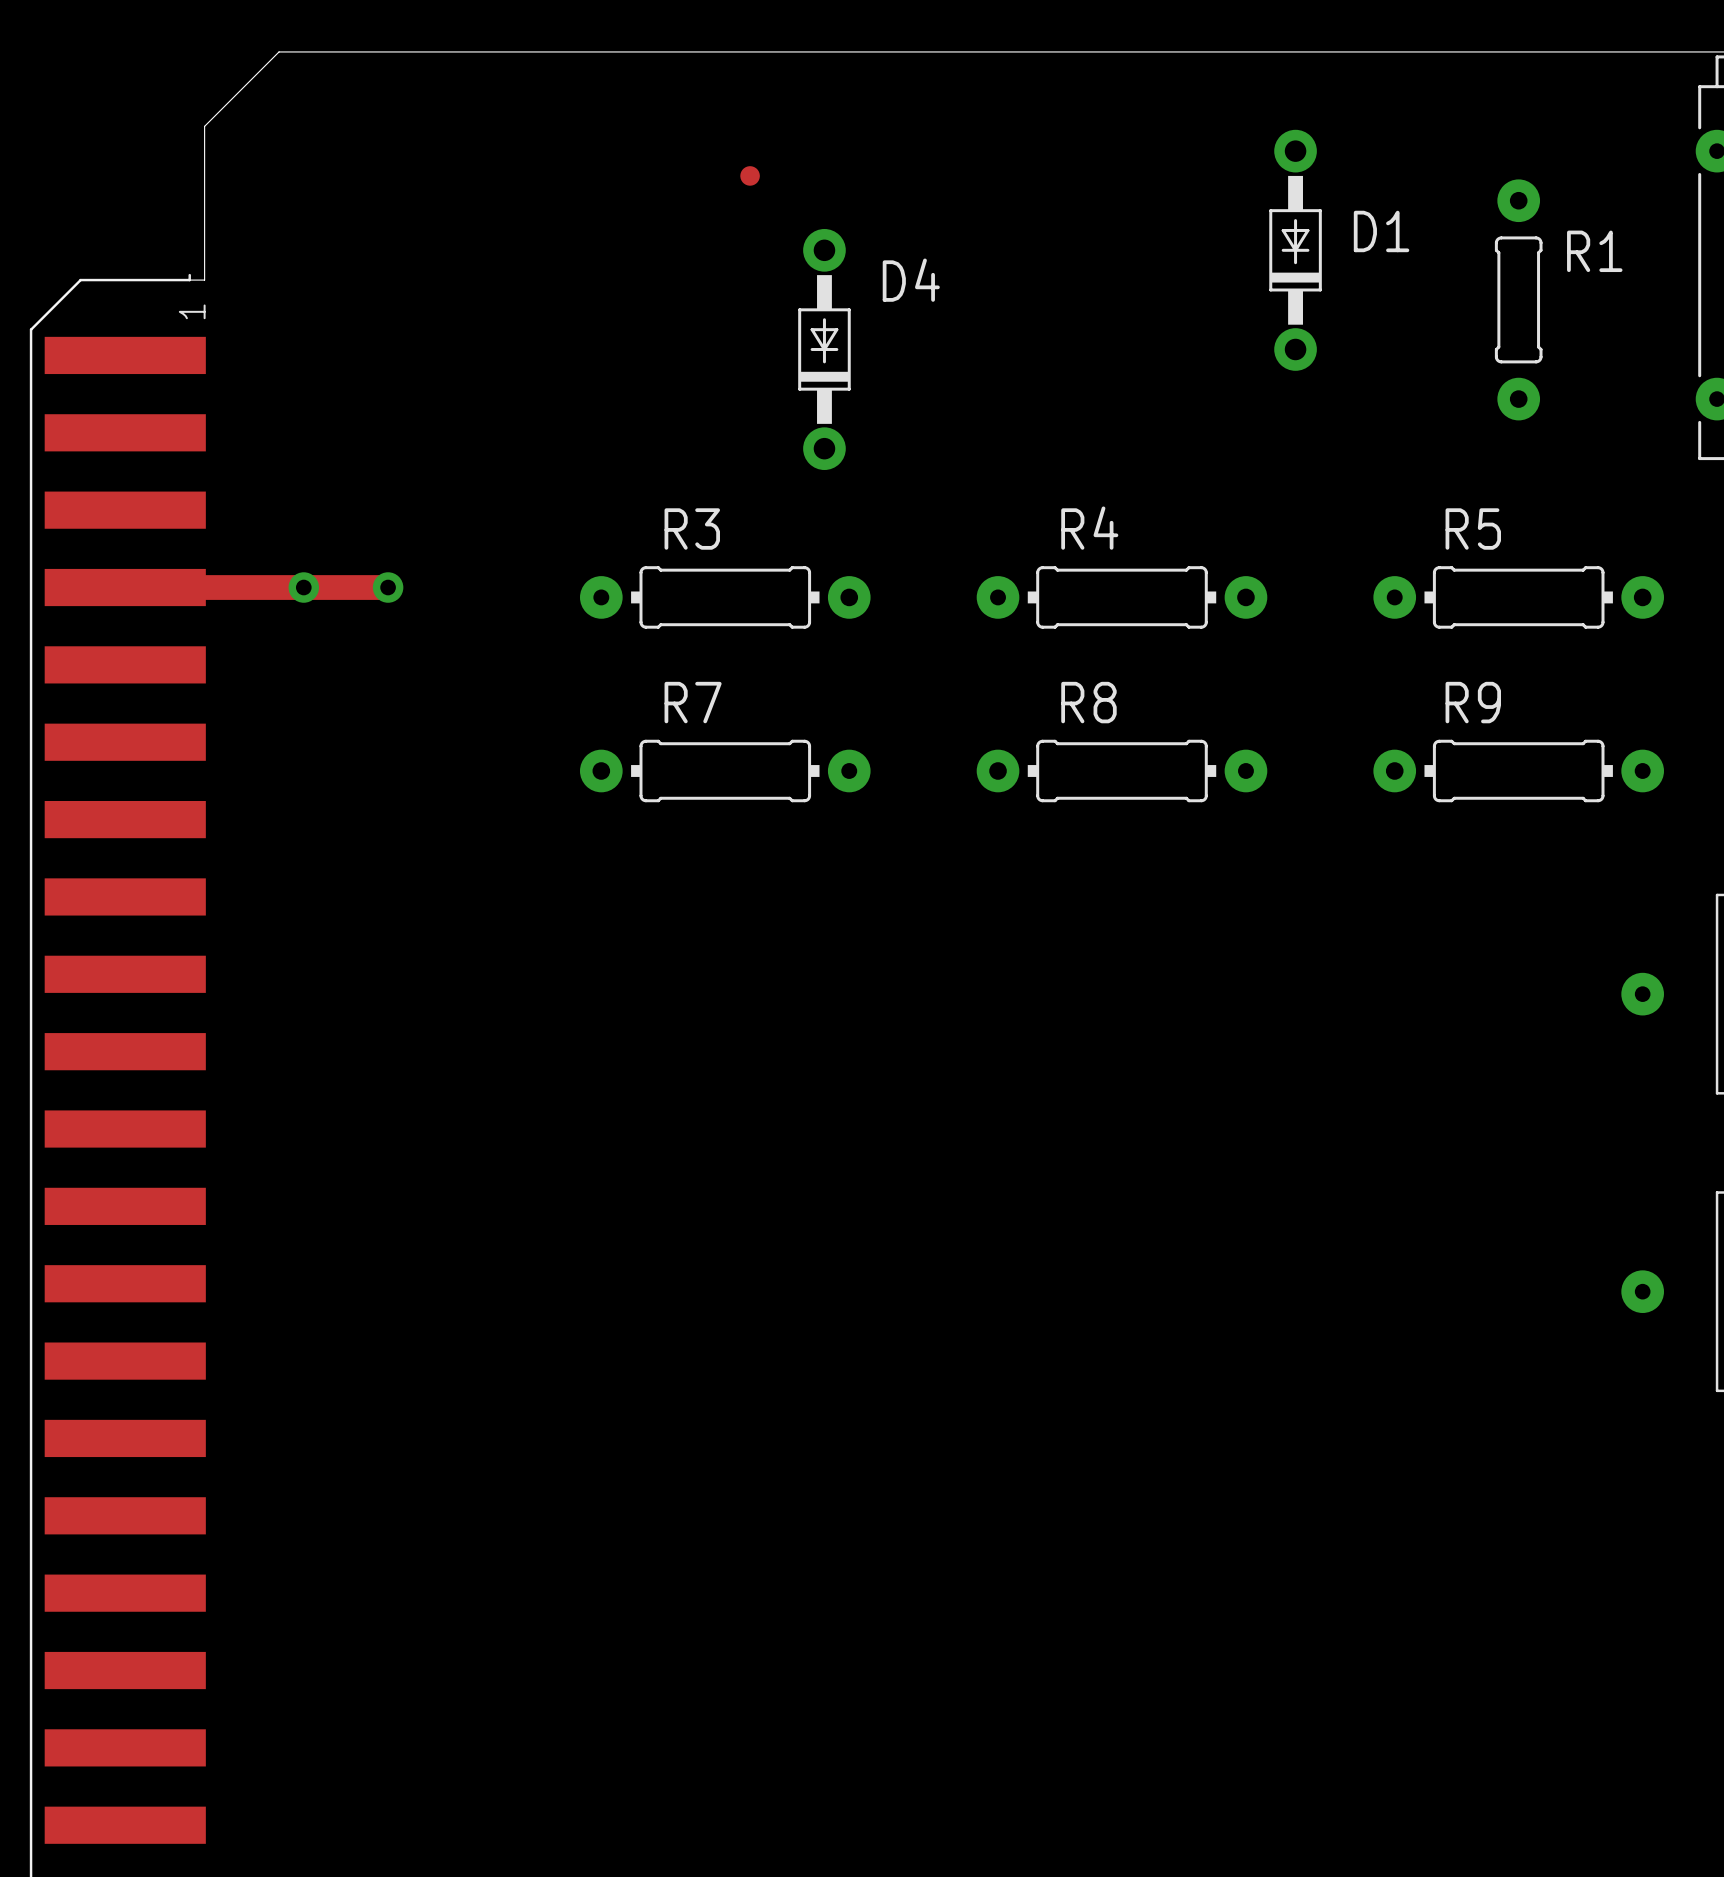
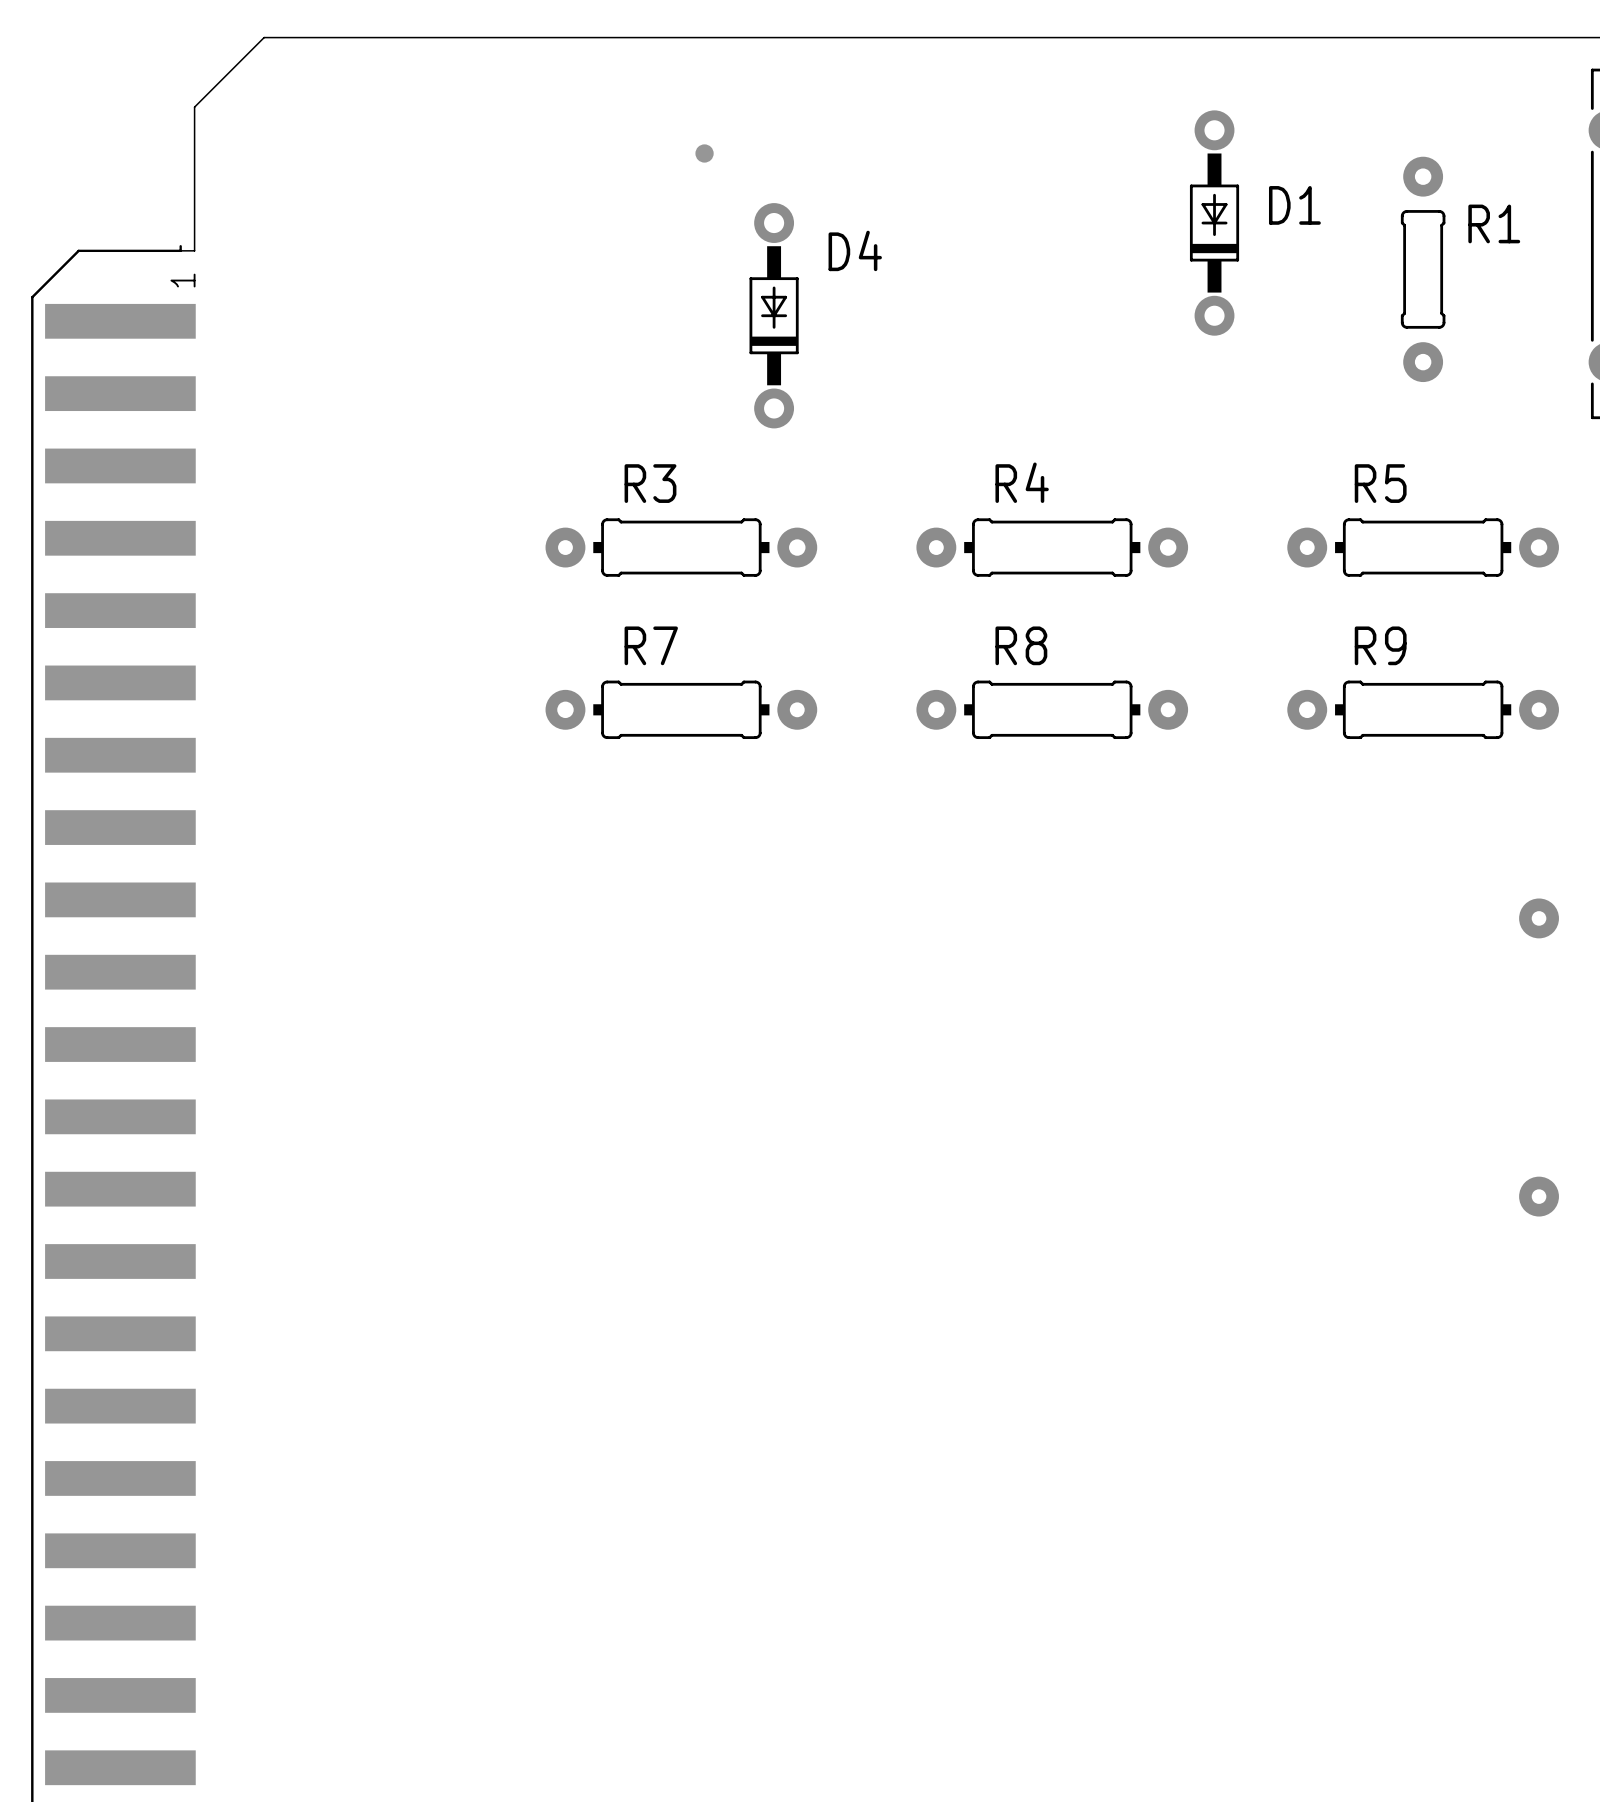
track: (125, 587) (388, 587) -> none
via: (303, 587) -> none
via: (388, 587) -> none

